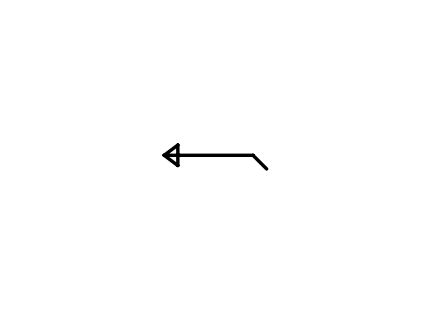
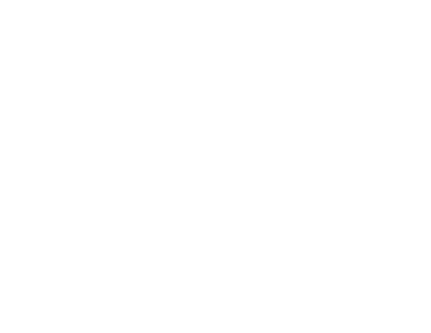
line: (164, 155) (253, 155) (266, 168) -> none
line: (164, 155) (177, 145) (177, 165) (164, 155) -> none

